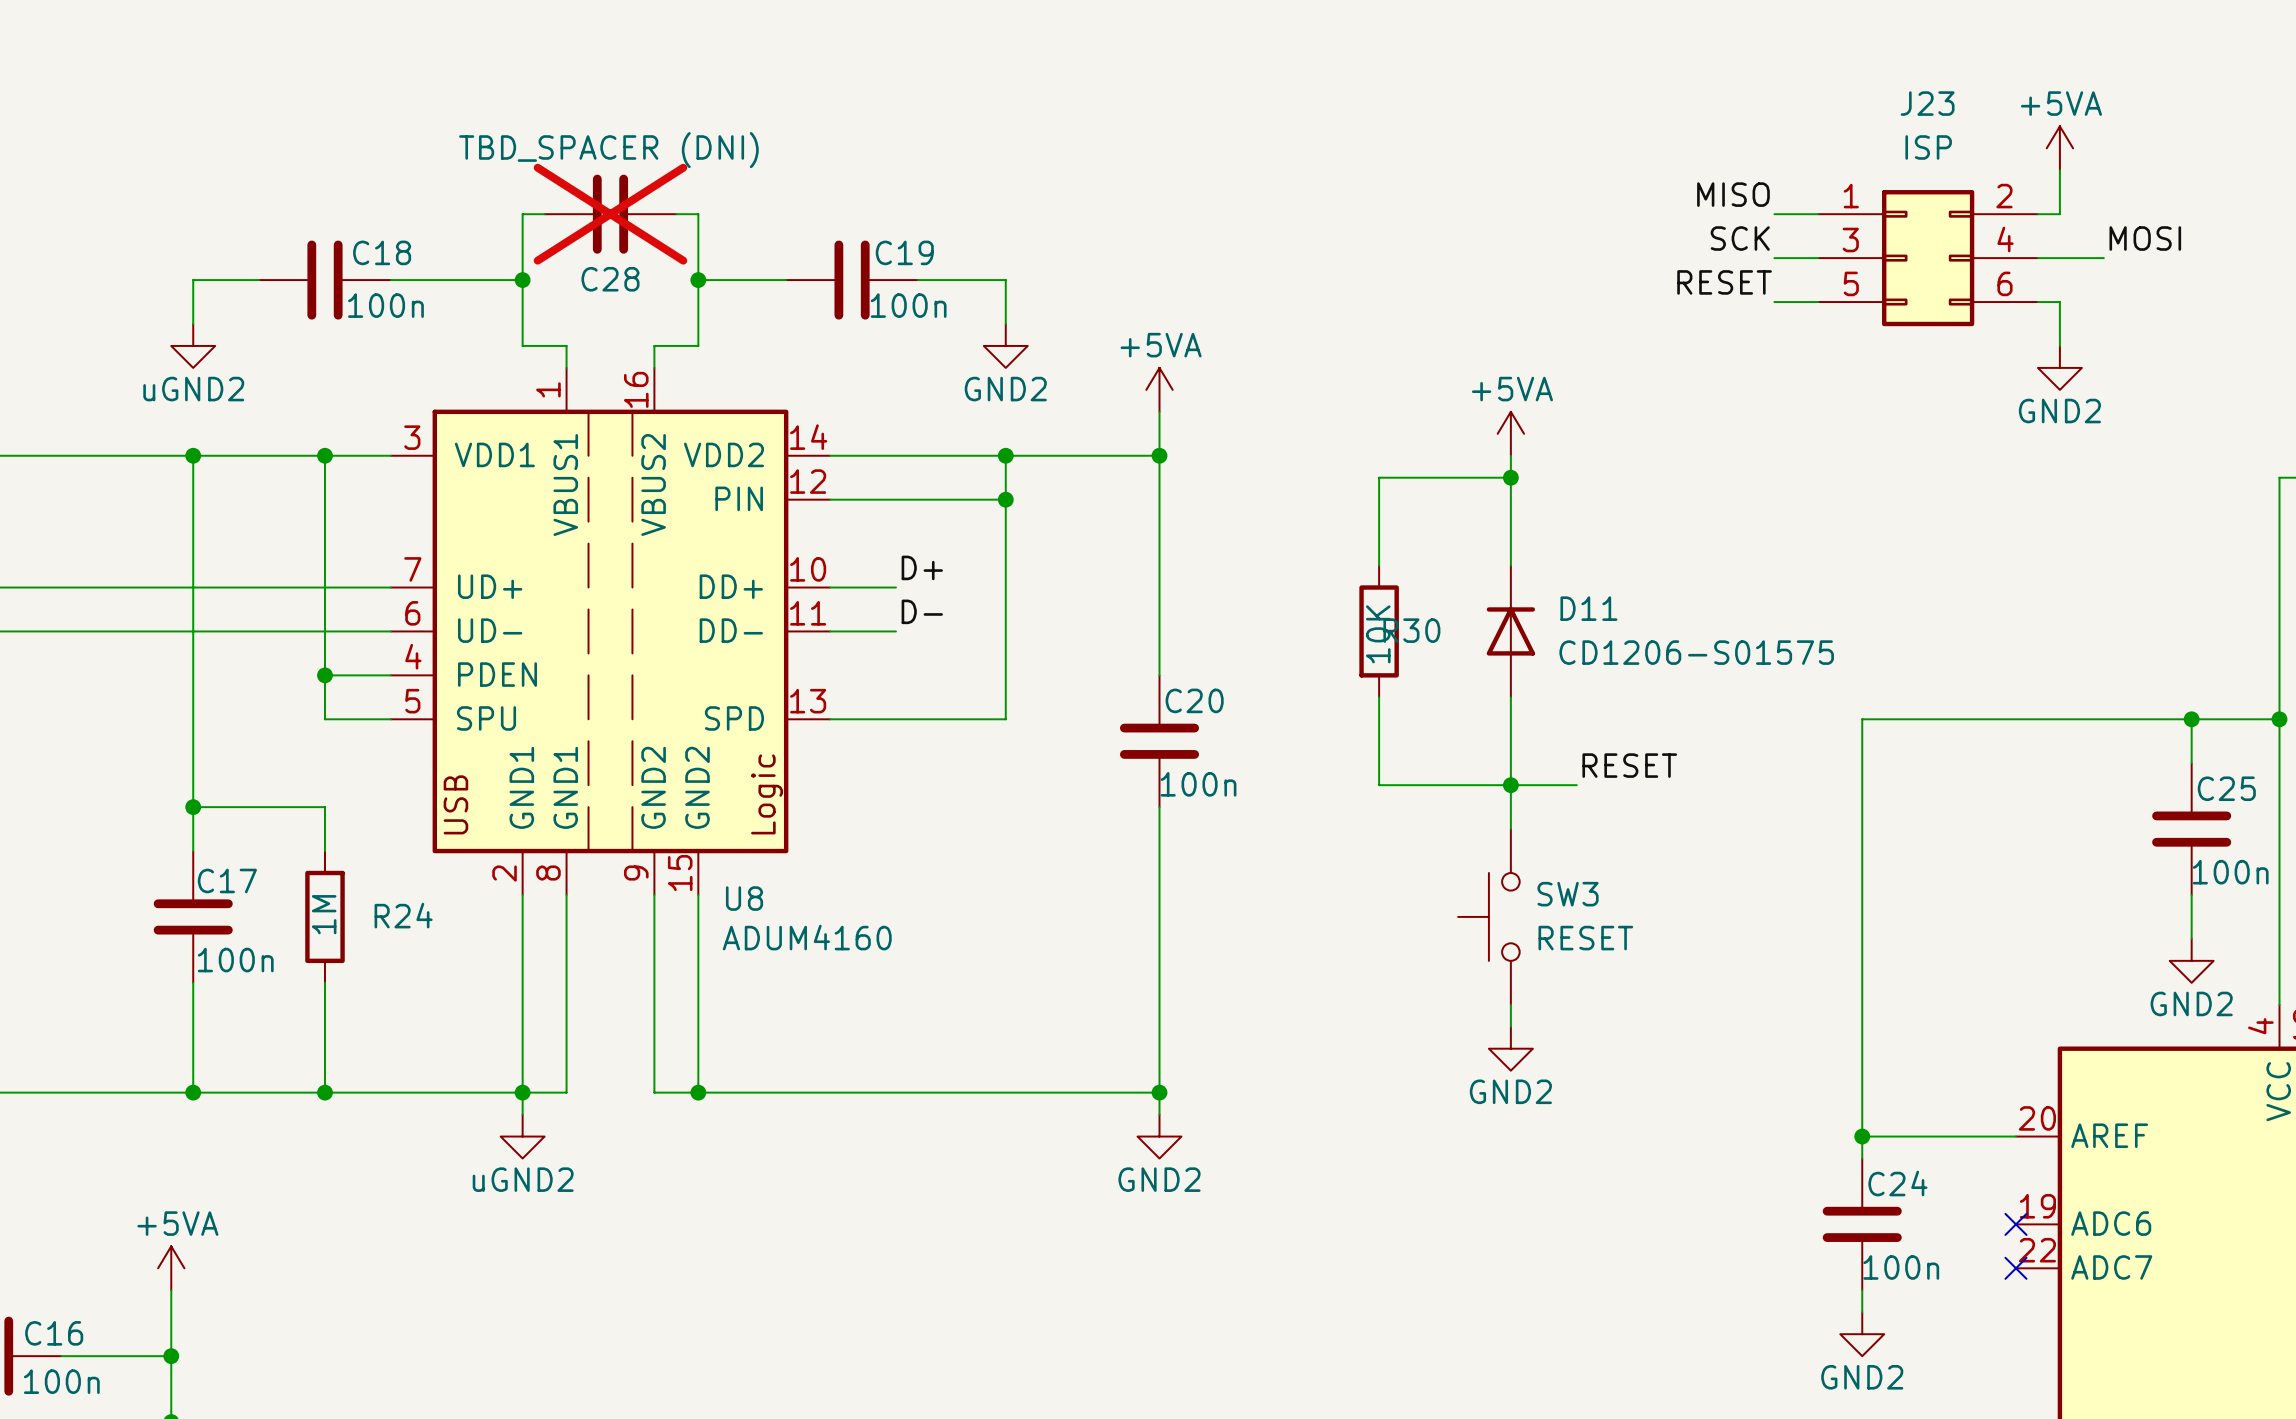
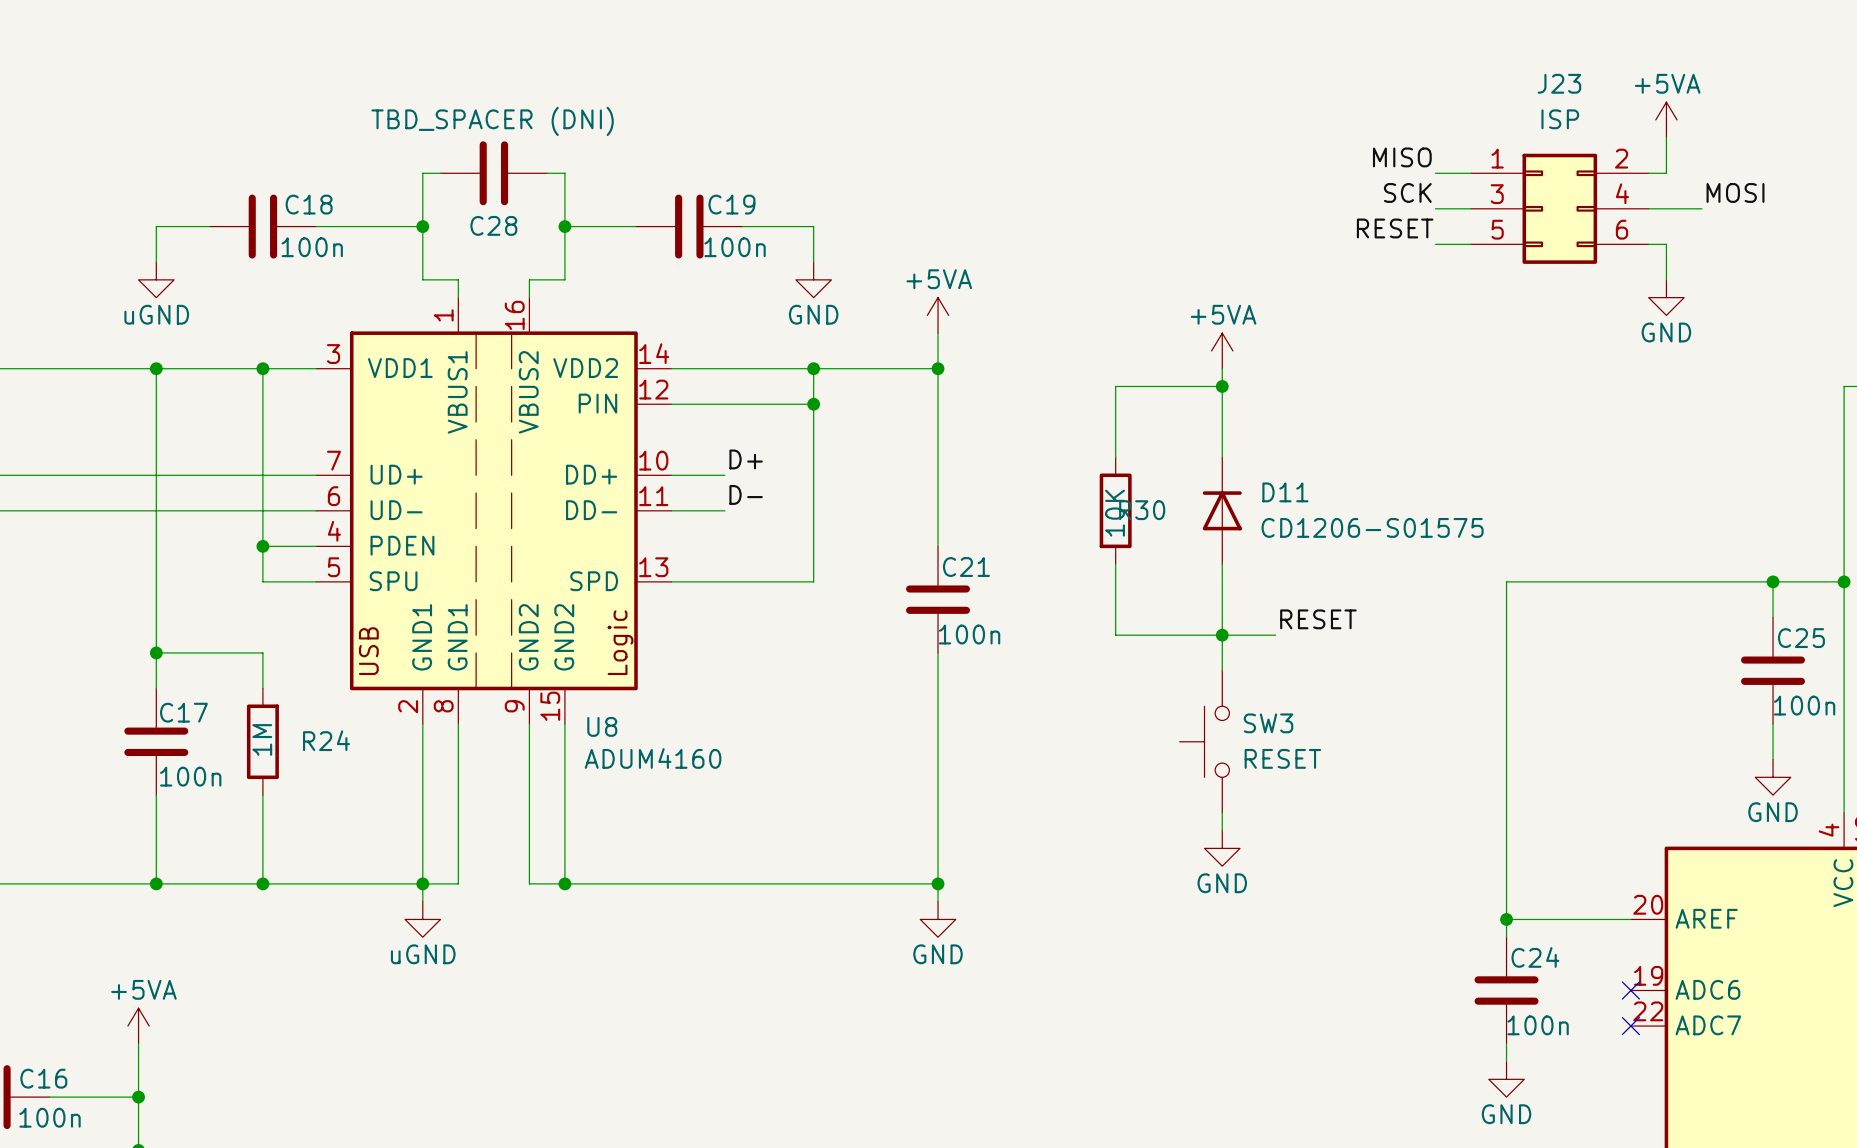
C28 do-not-place cross: (610, 214) -> none
power symbol: uGND2 (193, 345) -> uGND (156, 279)
power symbol: GND2 (1005, 345) -> GND (813, 279)
power symbol: GND2 (2059, 367) -> GND (1666, 297)
C20 name: C20 (1194, 700) -> C21 (966, 567)
power symbol: GND2 (2191, 960) -> GND (1773, 777)
power symbol: GND2 (1510, 1048) -> GND (1222, 848)
power symbol: uGND2 (522, 1136) -> uGND (422, 919)
power symbol: GND2 (1159, 1136) -> GND (938, 919)
power symbol: GND2 (1862, 1334) -> GND (1506, 1079)

